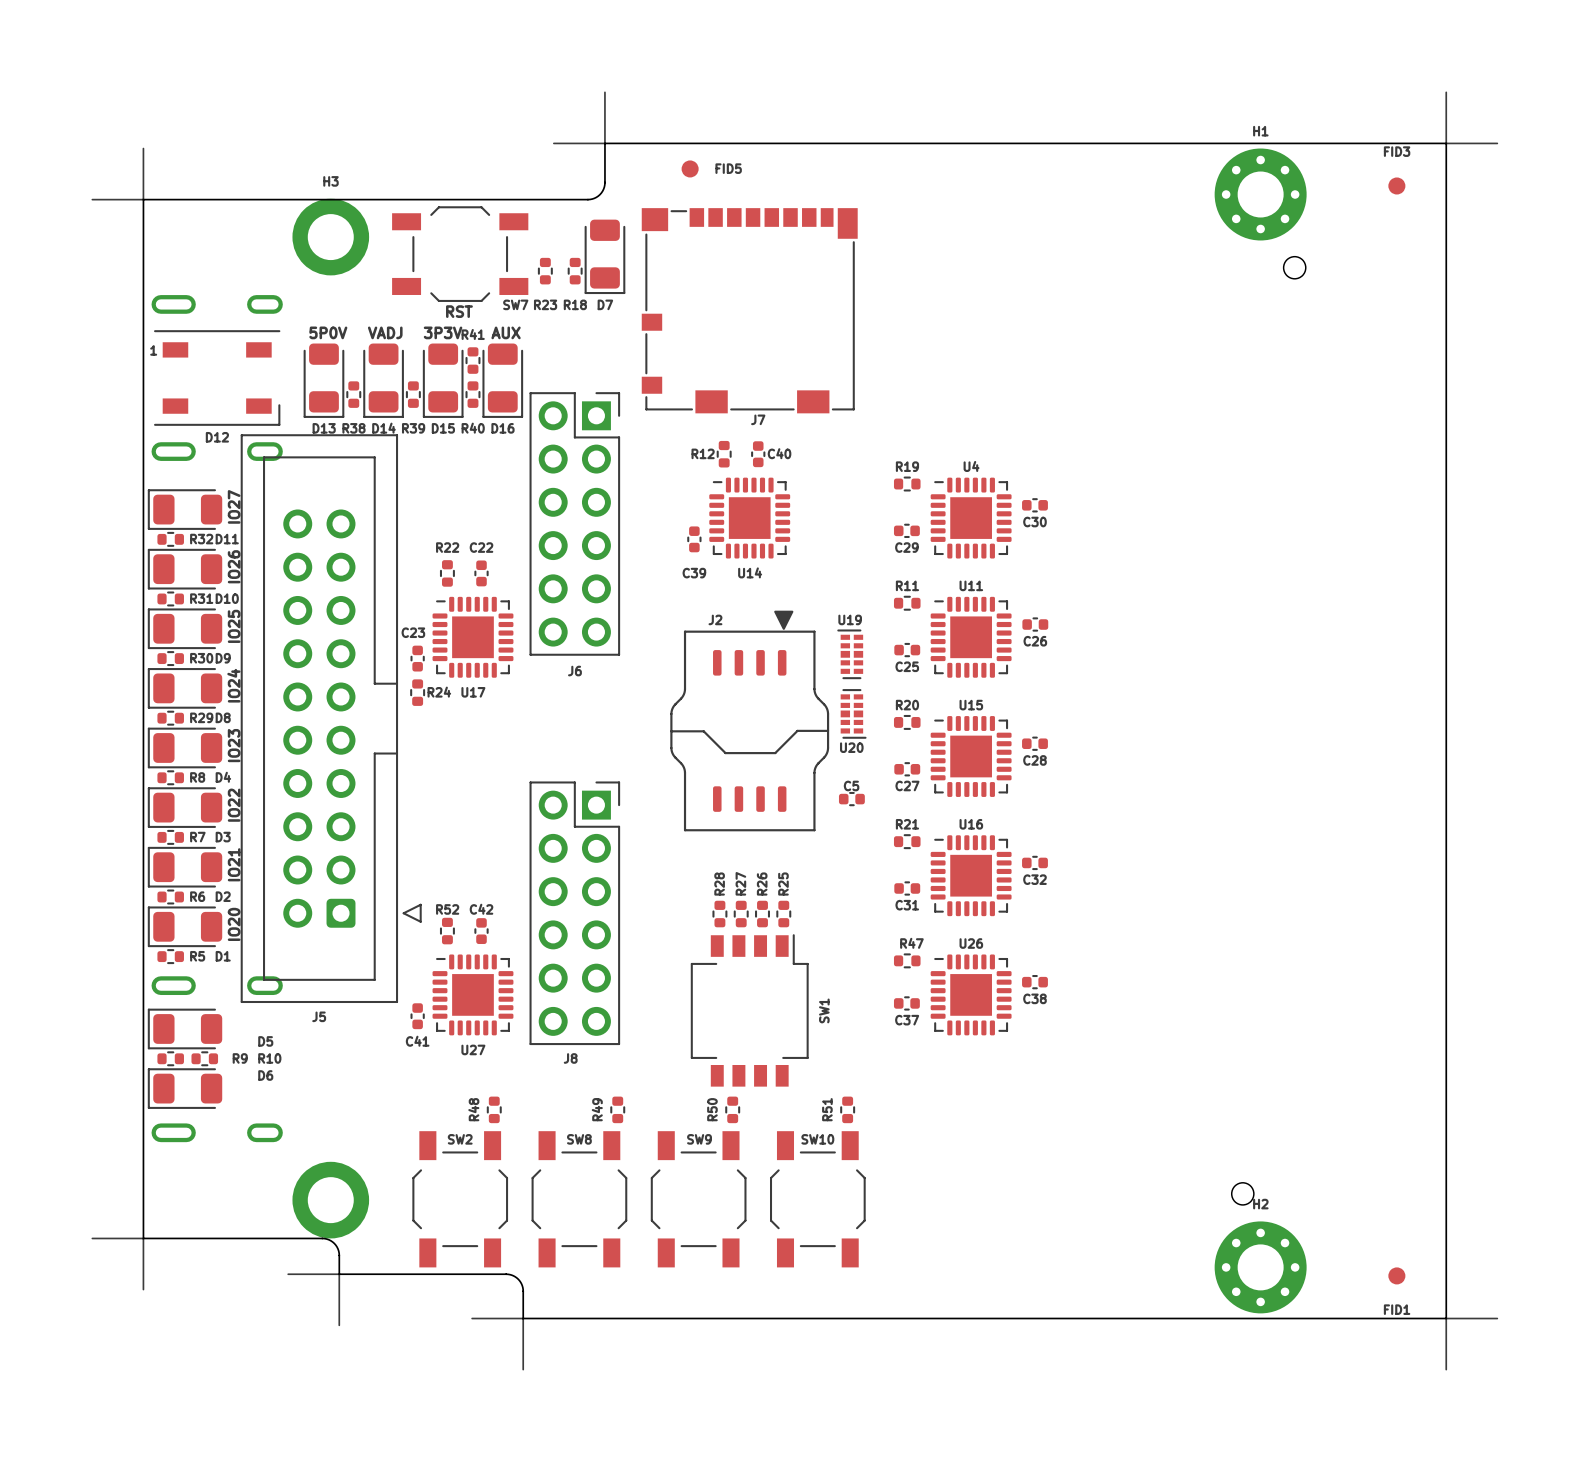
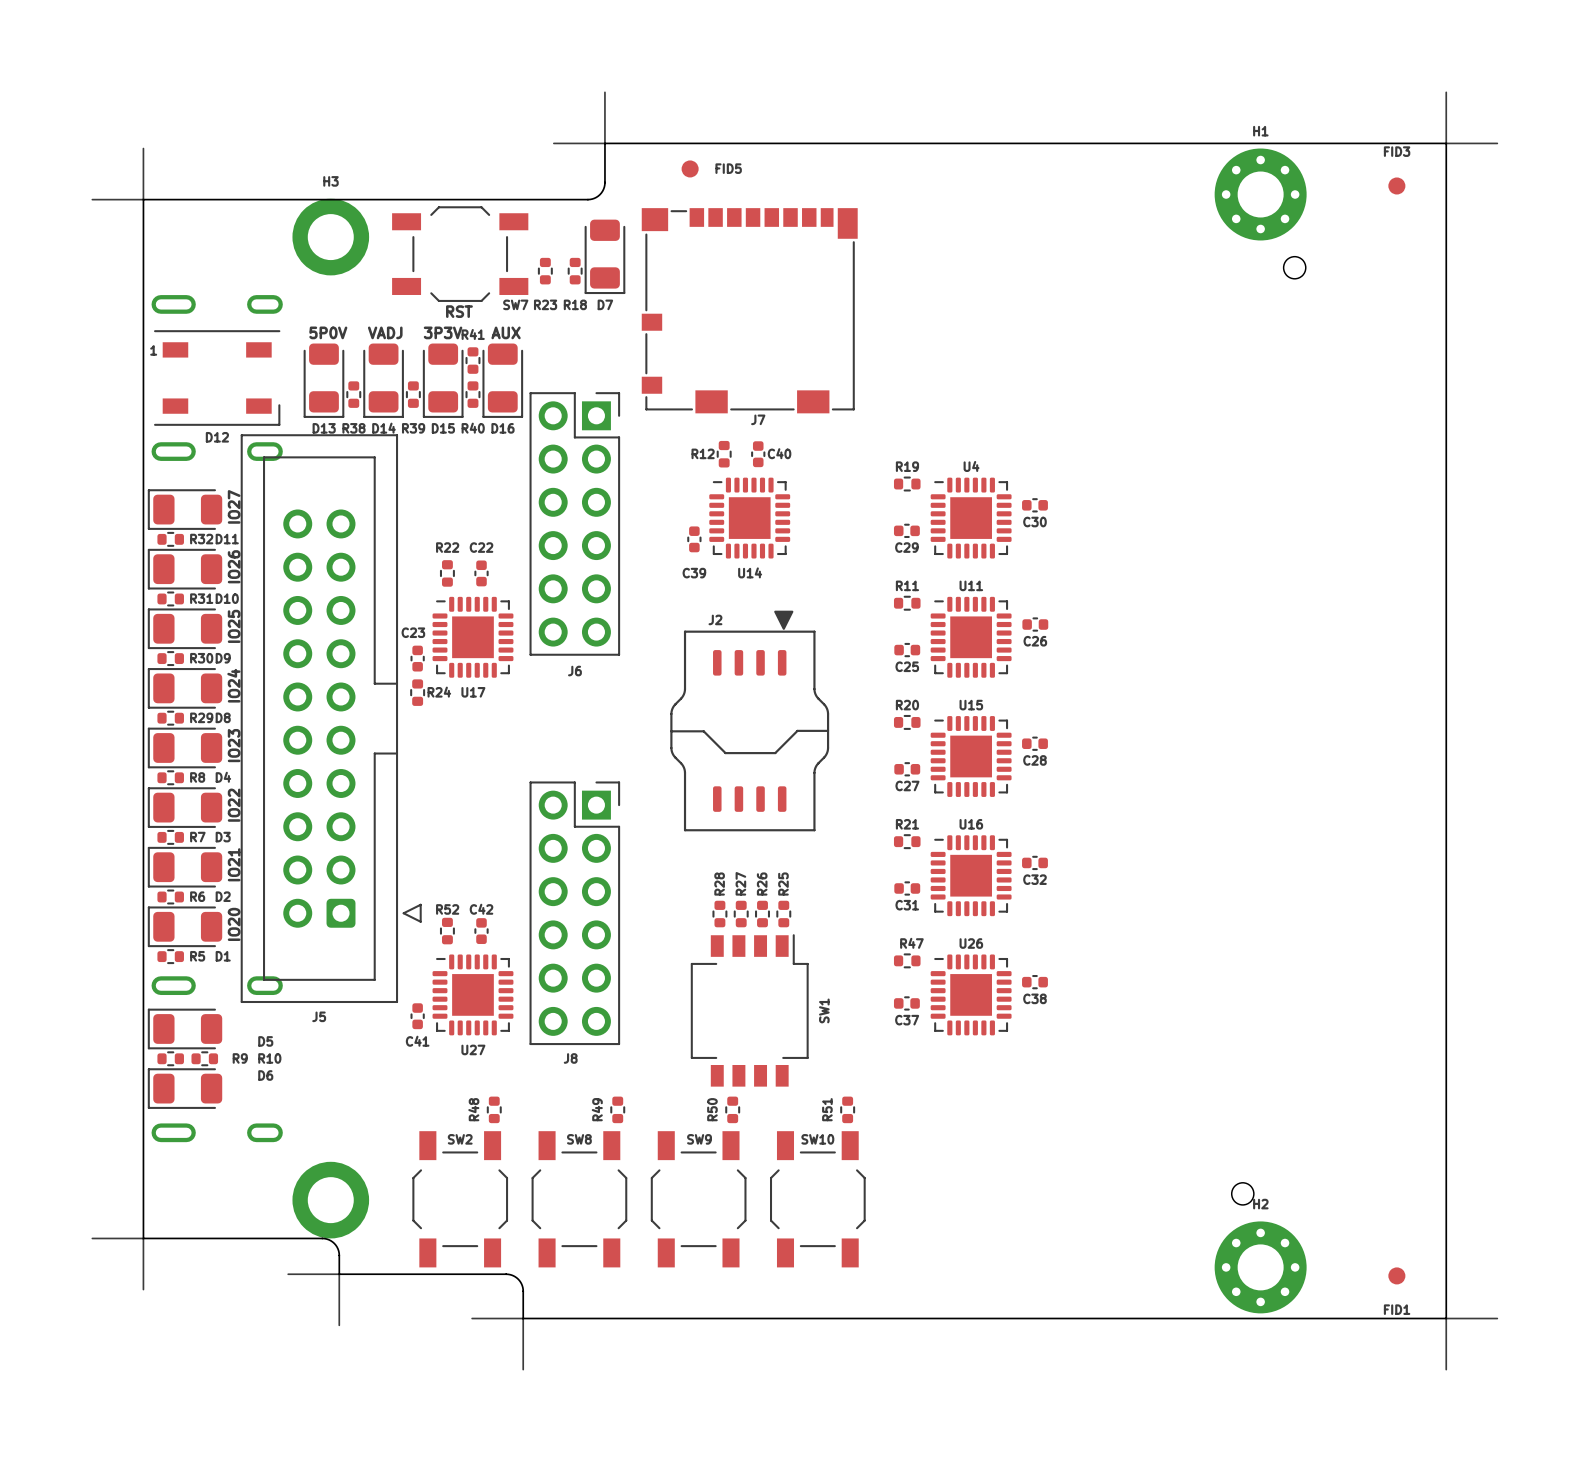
U19: (850, 654) -> none
U20: (853, 713) -> none
C5: (851, 799) -> none

